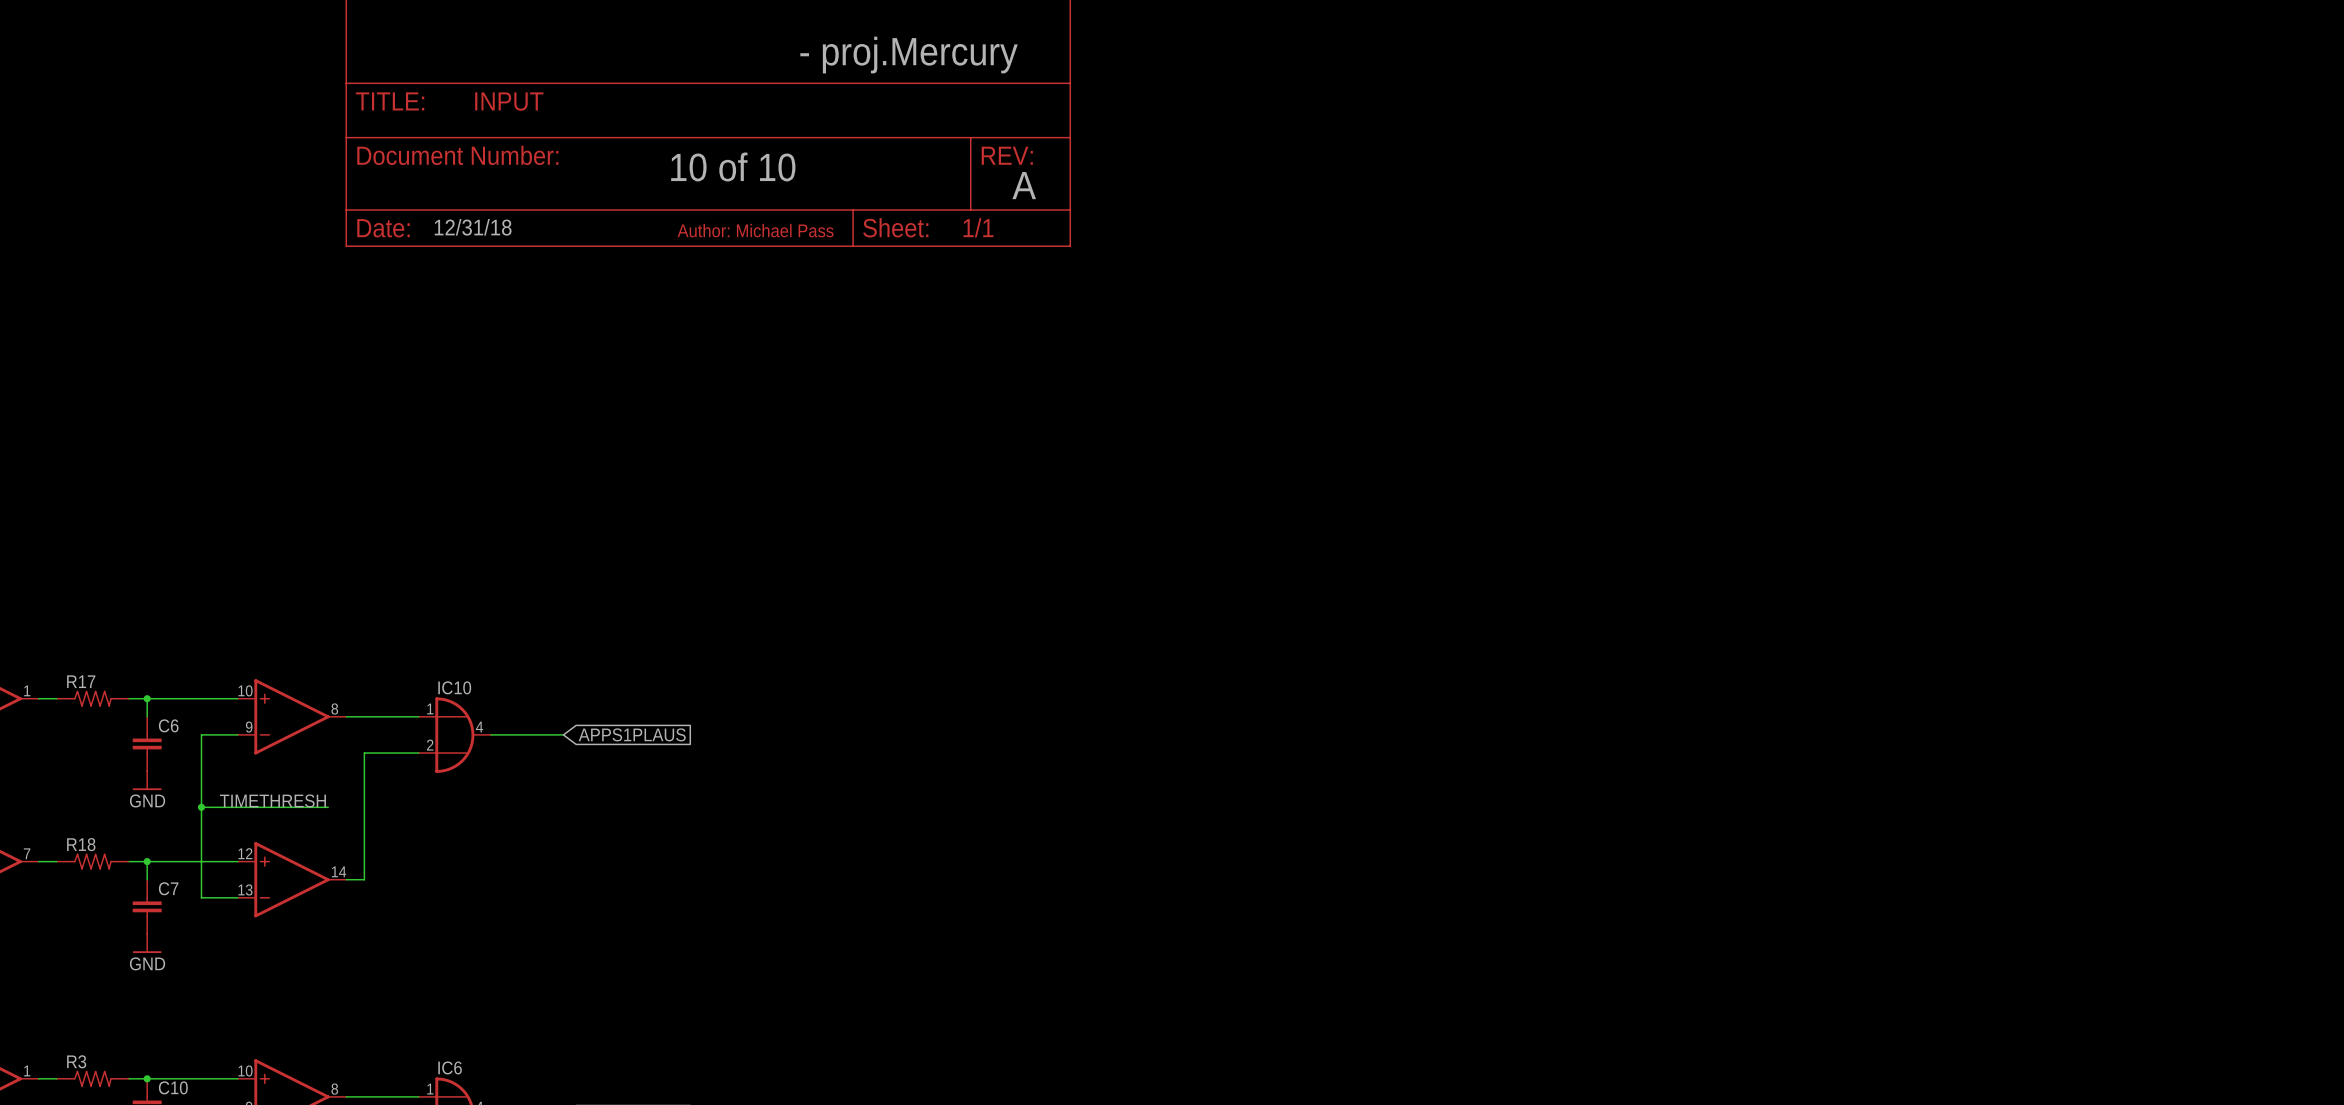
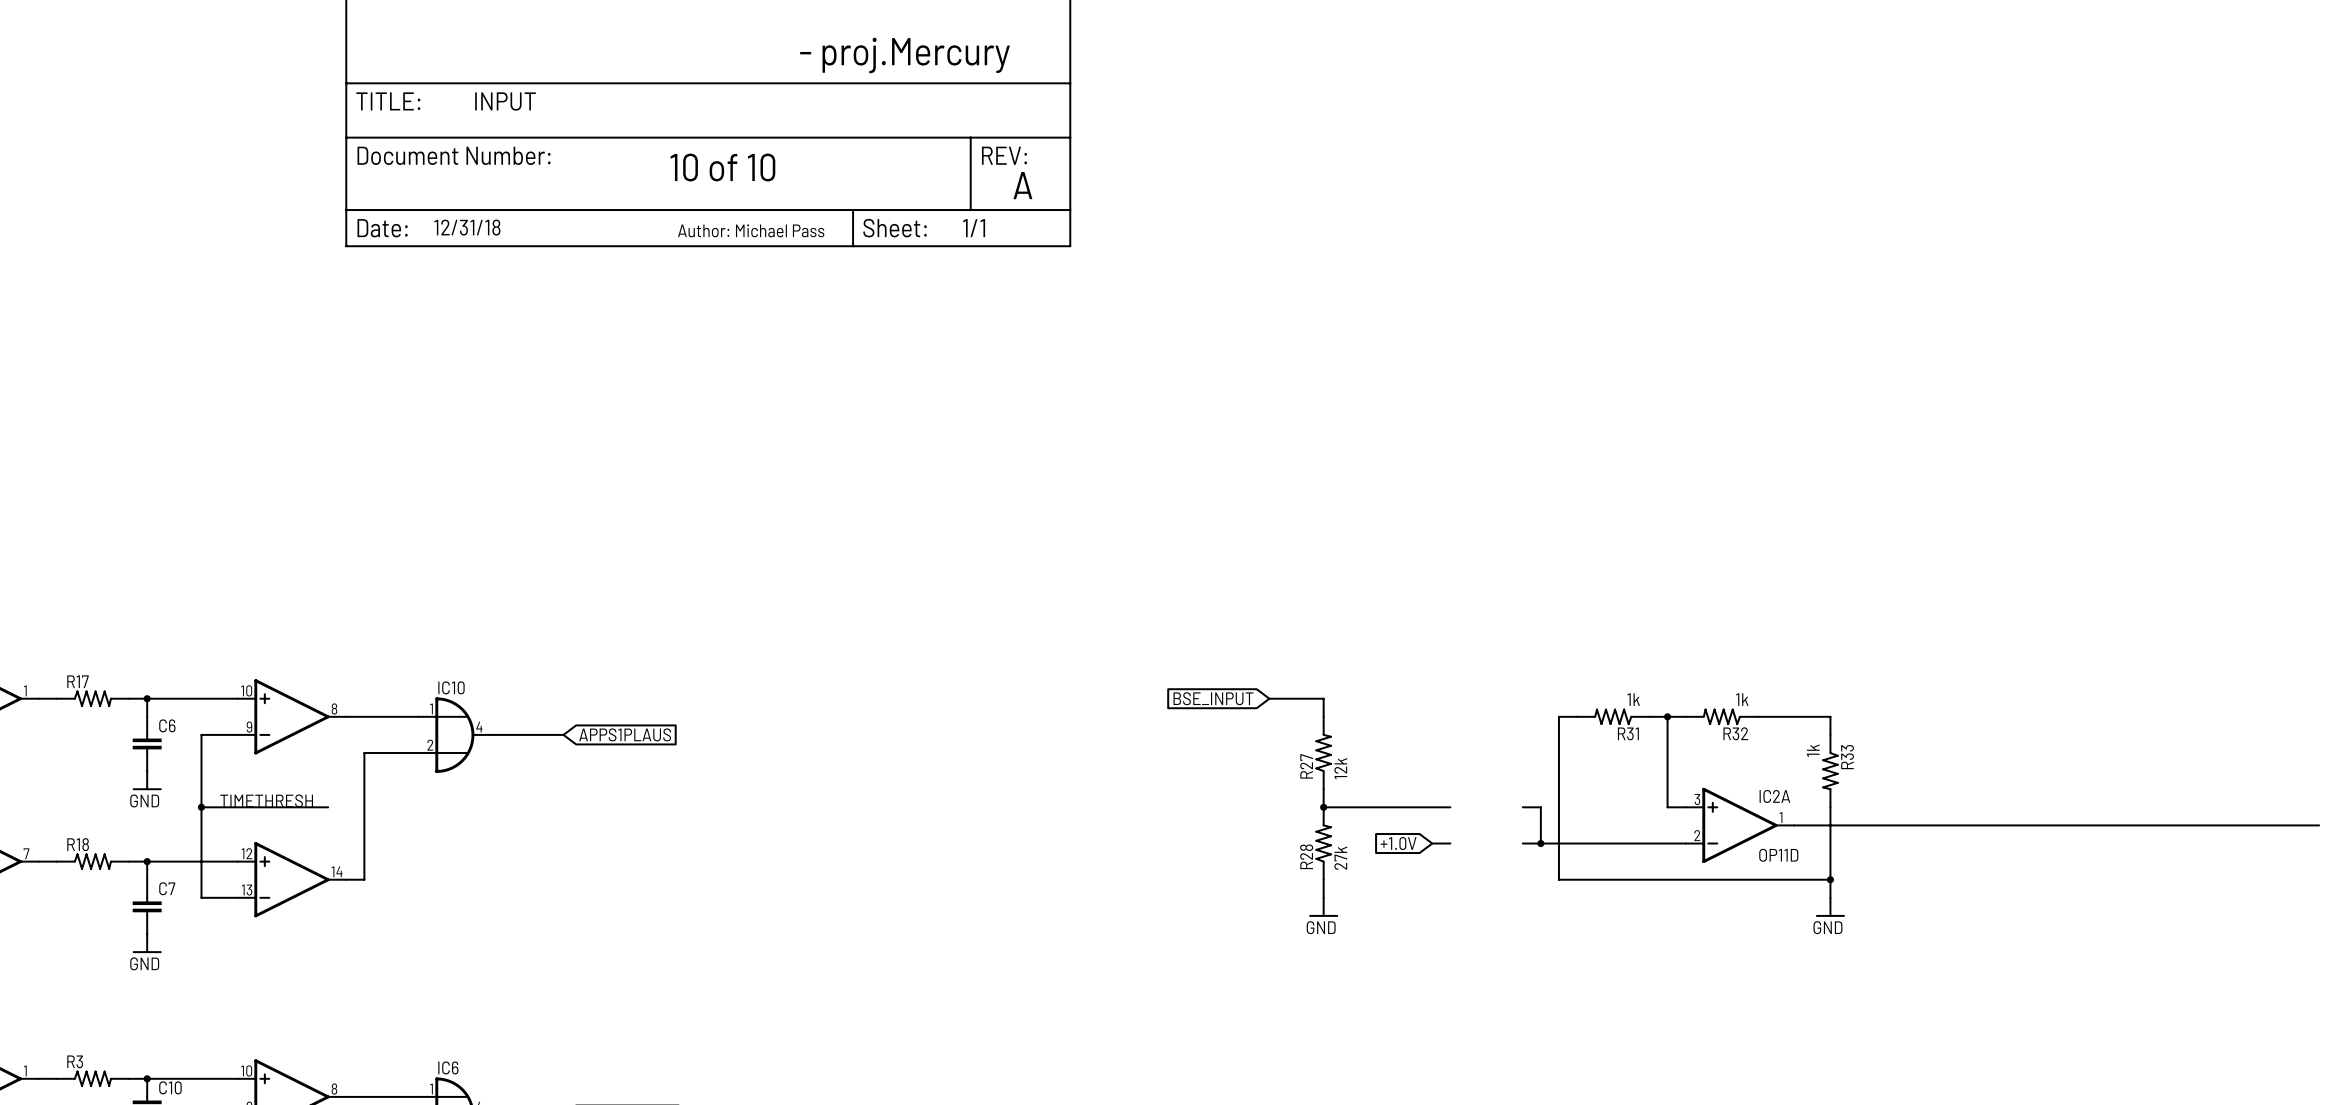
wire: none -> (1269, 698) (1323, 698) (1323, 716)
global label: none -> BSE_INPUT (1213, 698)
wire: none -> (1577, 716) (1558, 716) (1558, 879) (1830, 879)
R31: none -> 1k (1613, 716)
wire: none -> (1649, 716) (1685, 716)
wire: none -> (1667, 716) (1667, 807) (1685, 807)
junction: none -> (1667, 716)
R32: none -> 1k (1721, 716)
wire: none -> (1758, 716) (1830, 716) (1830, 734)
R27: none -> 12k (1323, 753)
R33: none -> 1k (1830, 771)
wire: none -> (1323, 789) (1323, 807) (1450, 807)
junction: none -> (1323, 807)
wire: none -> (1522, 807) (1540, 807) (1540, 843)
wire: none -> (1830, 807) (1830, 897)
IC2A: none -> OP11D (1739, 825)
wire: none -> (1794, 825) (2319, 825)
R28: none -> 27k (1323, 843)
global label: none -> +1.0V (1398, 843)
wire: none -> (1432, 843) (1450, 843)
wire: none -> (1522, 843) (1685, 843)
junction: none -> (1540, 843)
wire: none -> (1323, 879) (1323, 897)
junction: none -> (1830, 879)
power symbol: none -> GND (1323, 907)
power symbol: none -> GND (1830, 907)

